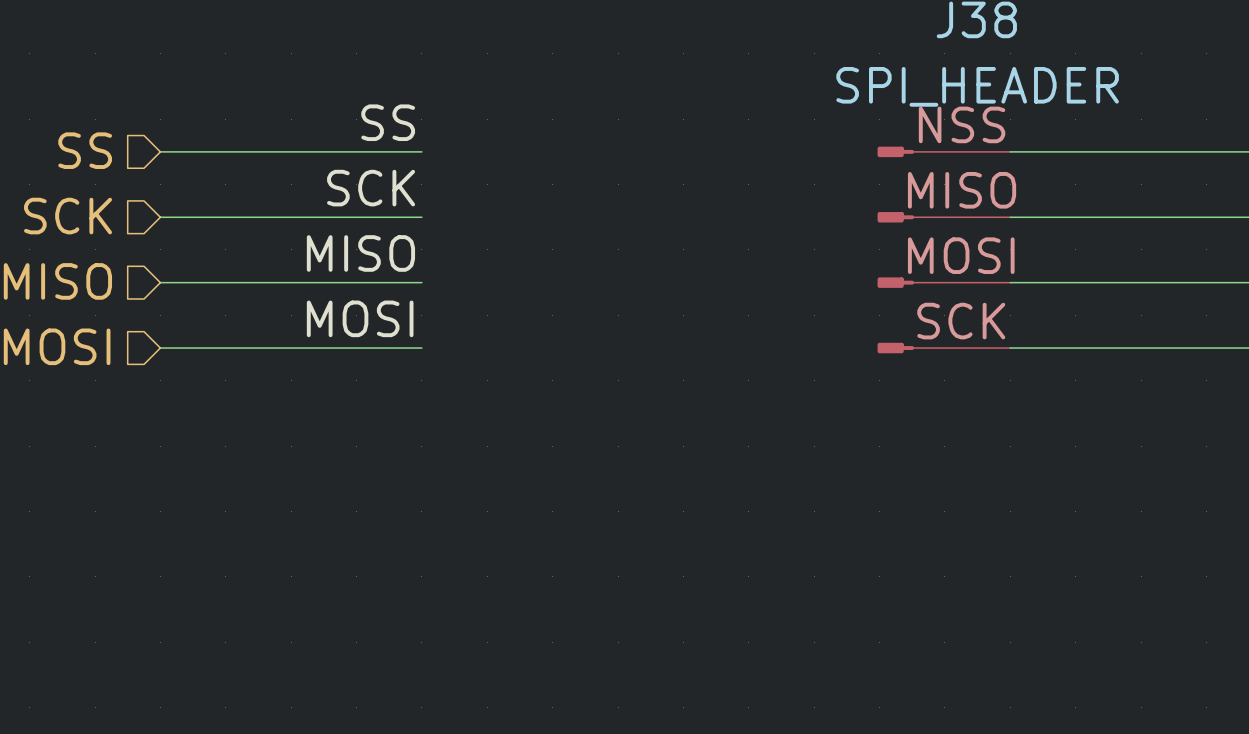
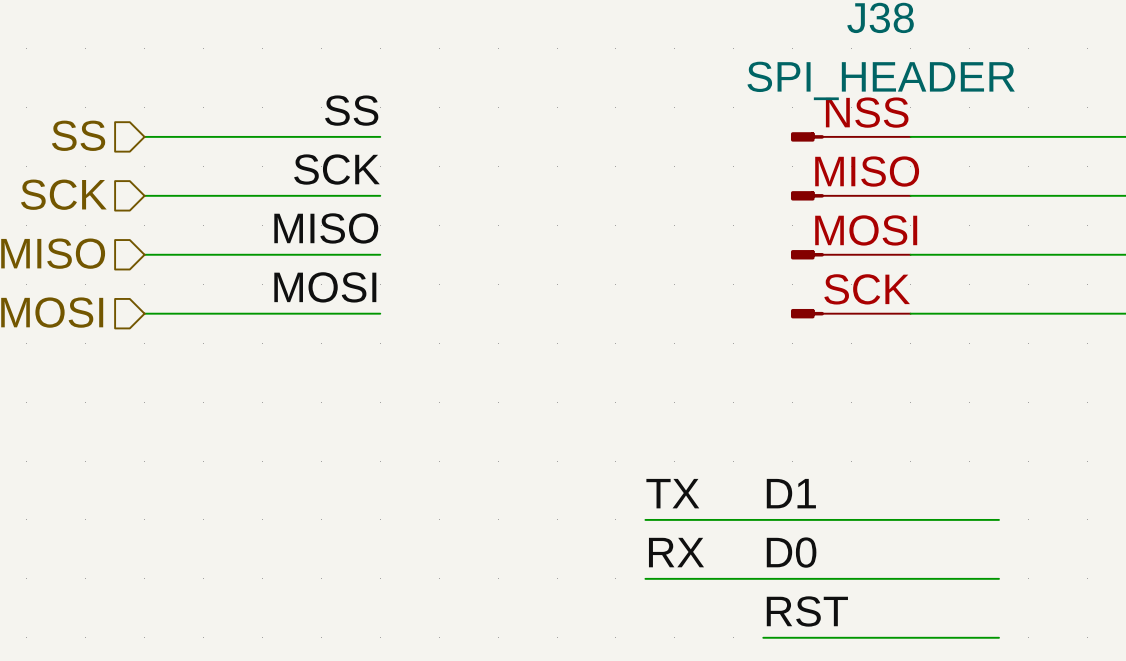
label: none -> TX (672, 493)
label: none -> D1 (791, 493)
wire: none -> (645, 519) (999, 519)
label: none -> RX (676, 552)
label: none -> D0 (791, 552)
wire: none -> (645, 578) (999, 578)
label: none -> RST (807, 611)
wire: none -> (763, 637) (999, 637)

